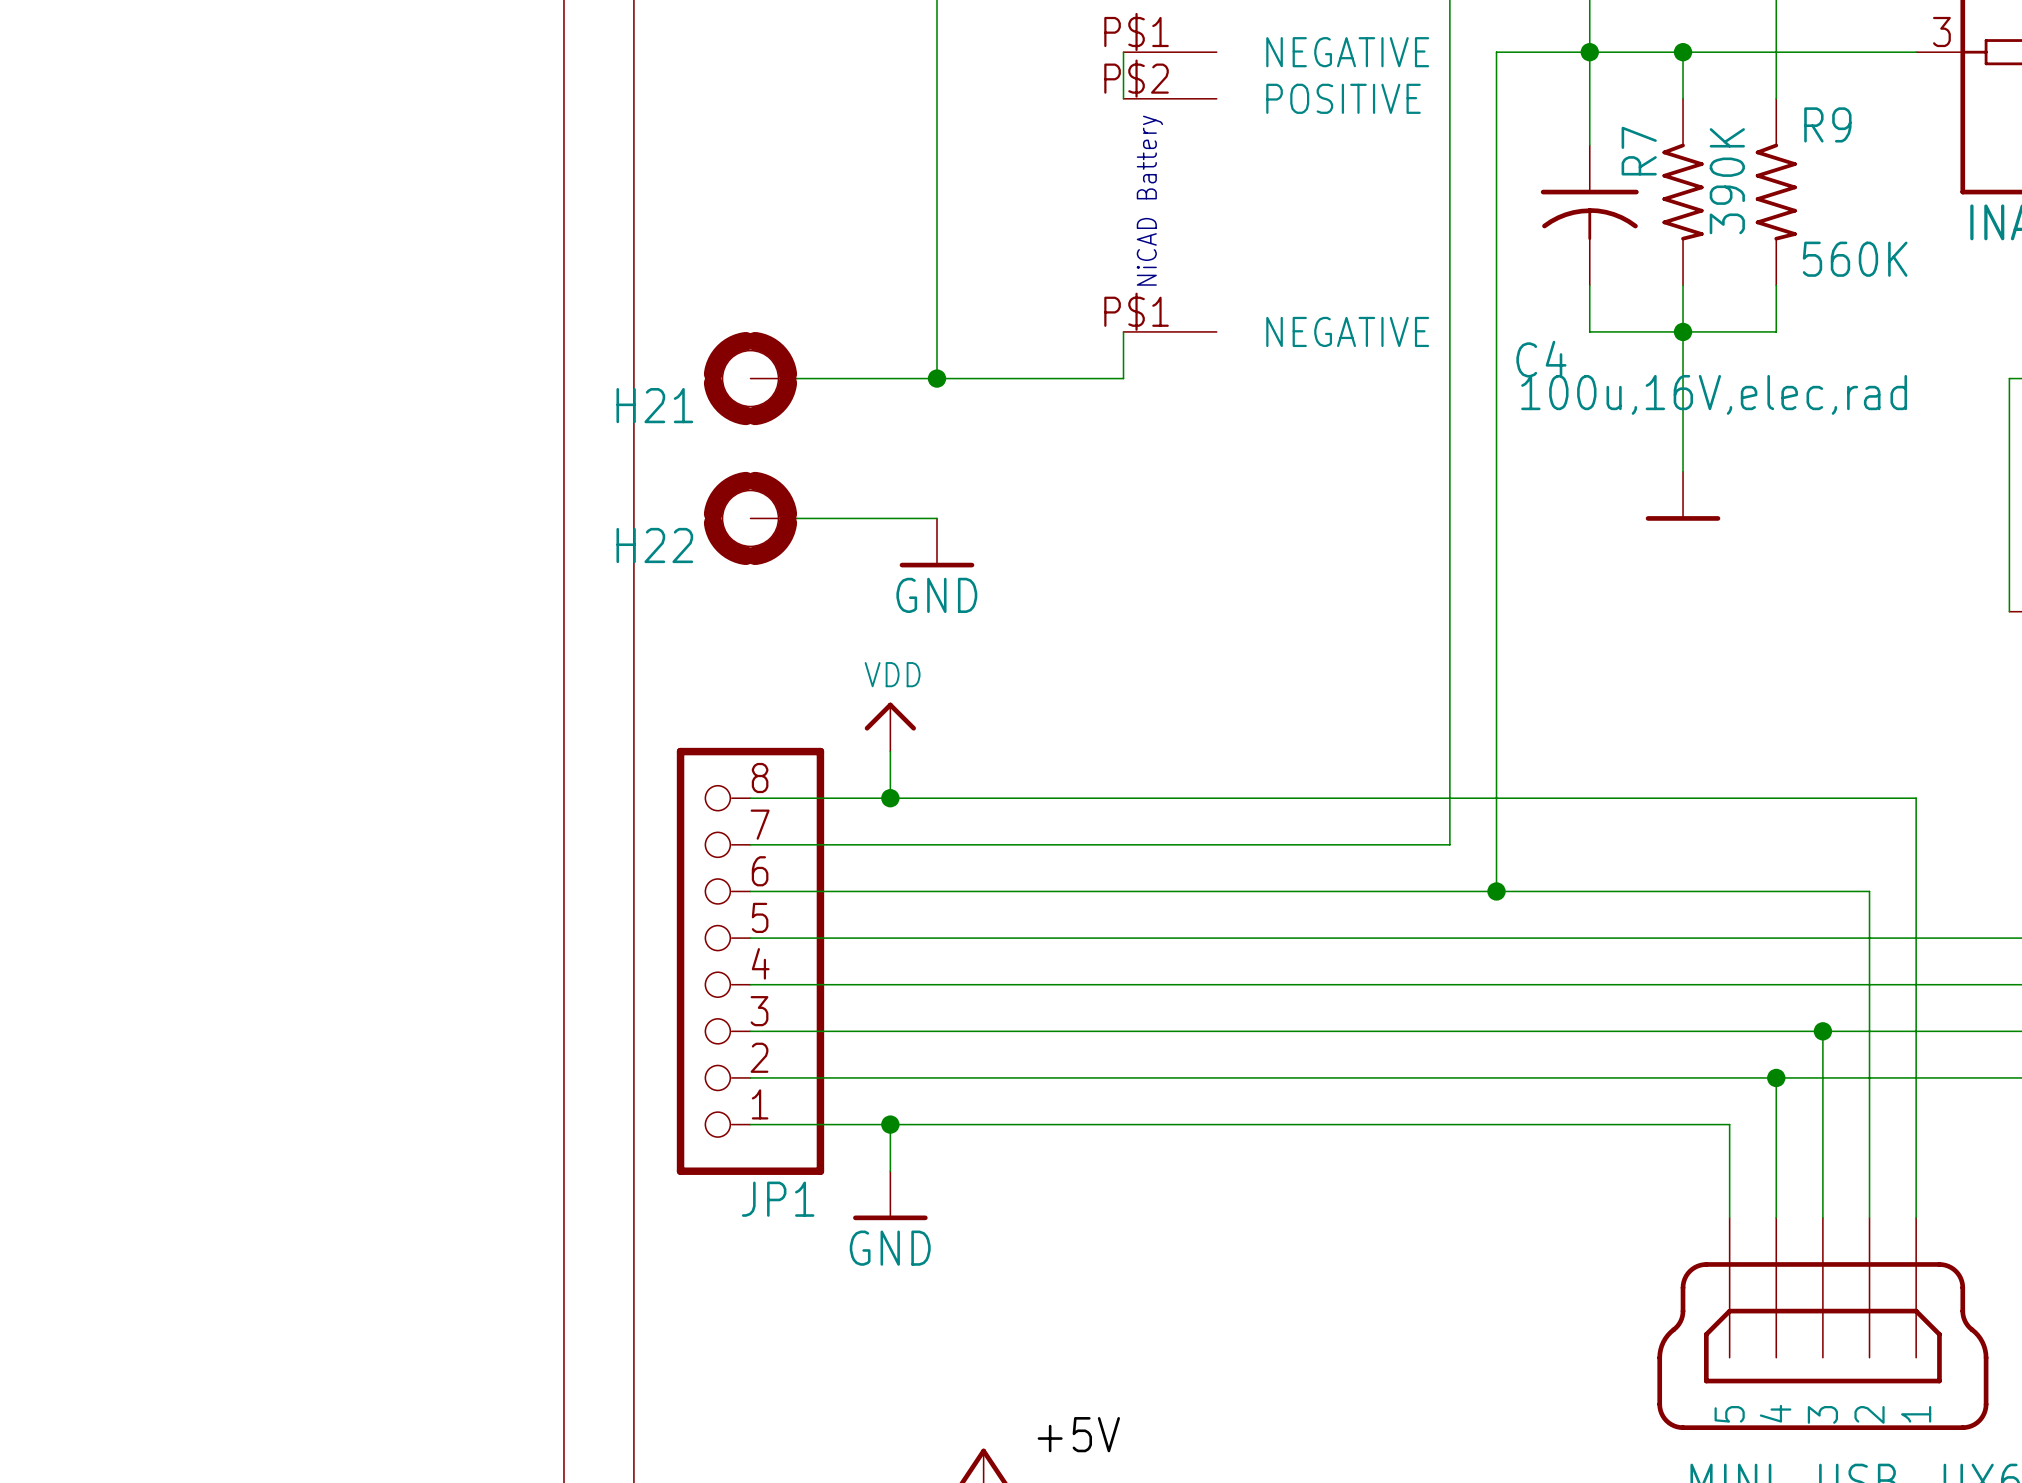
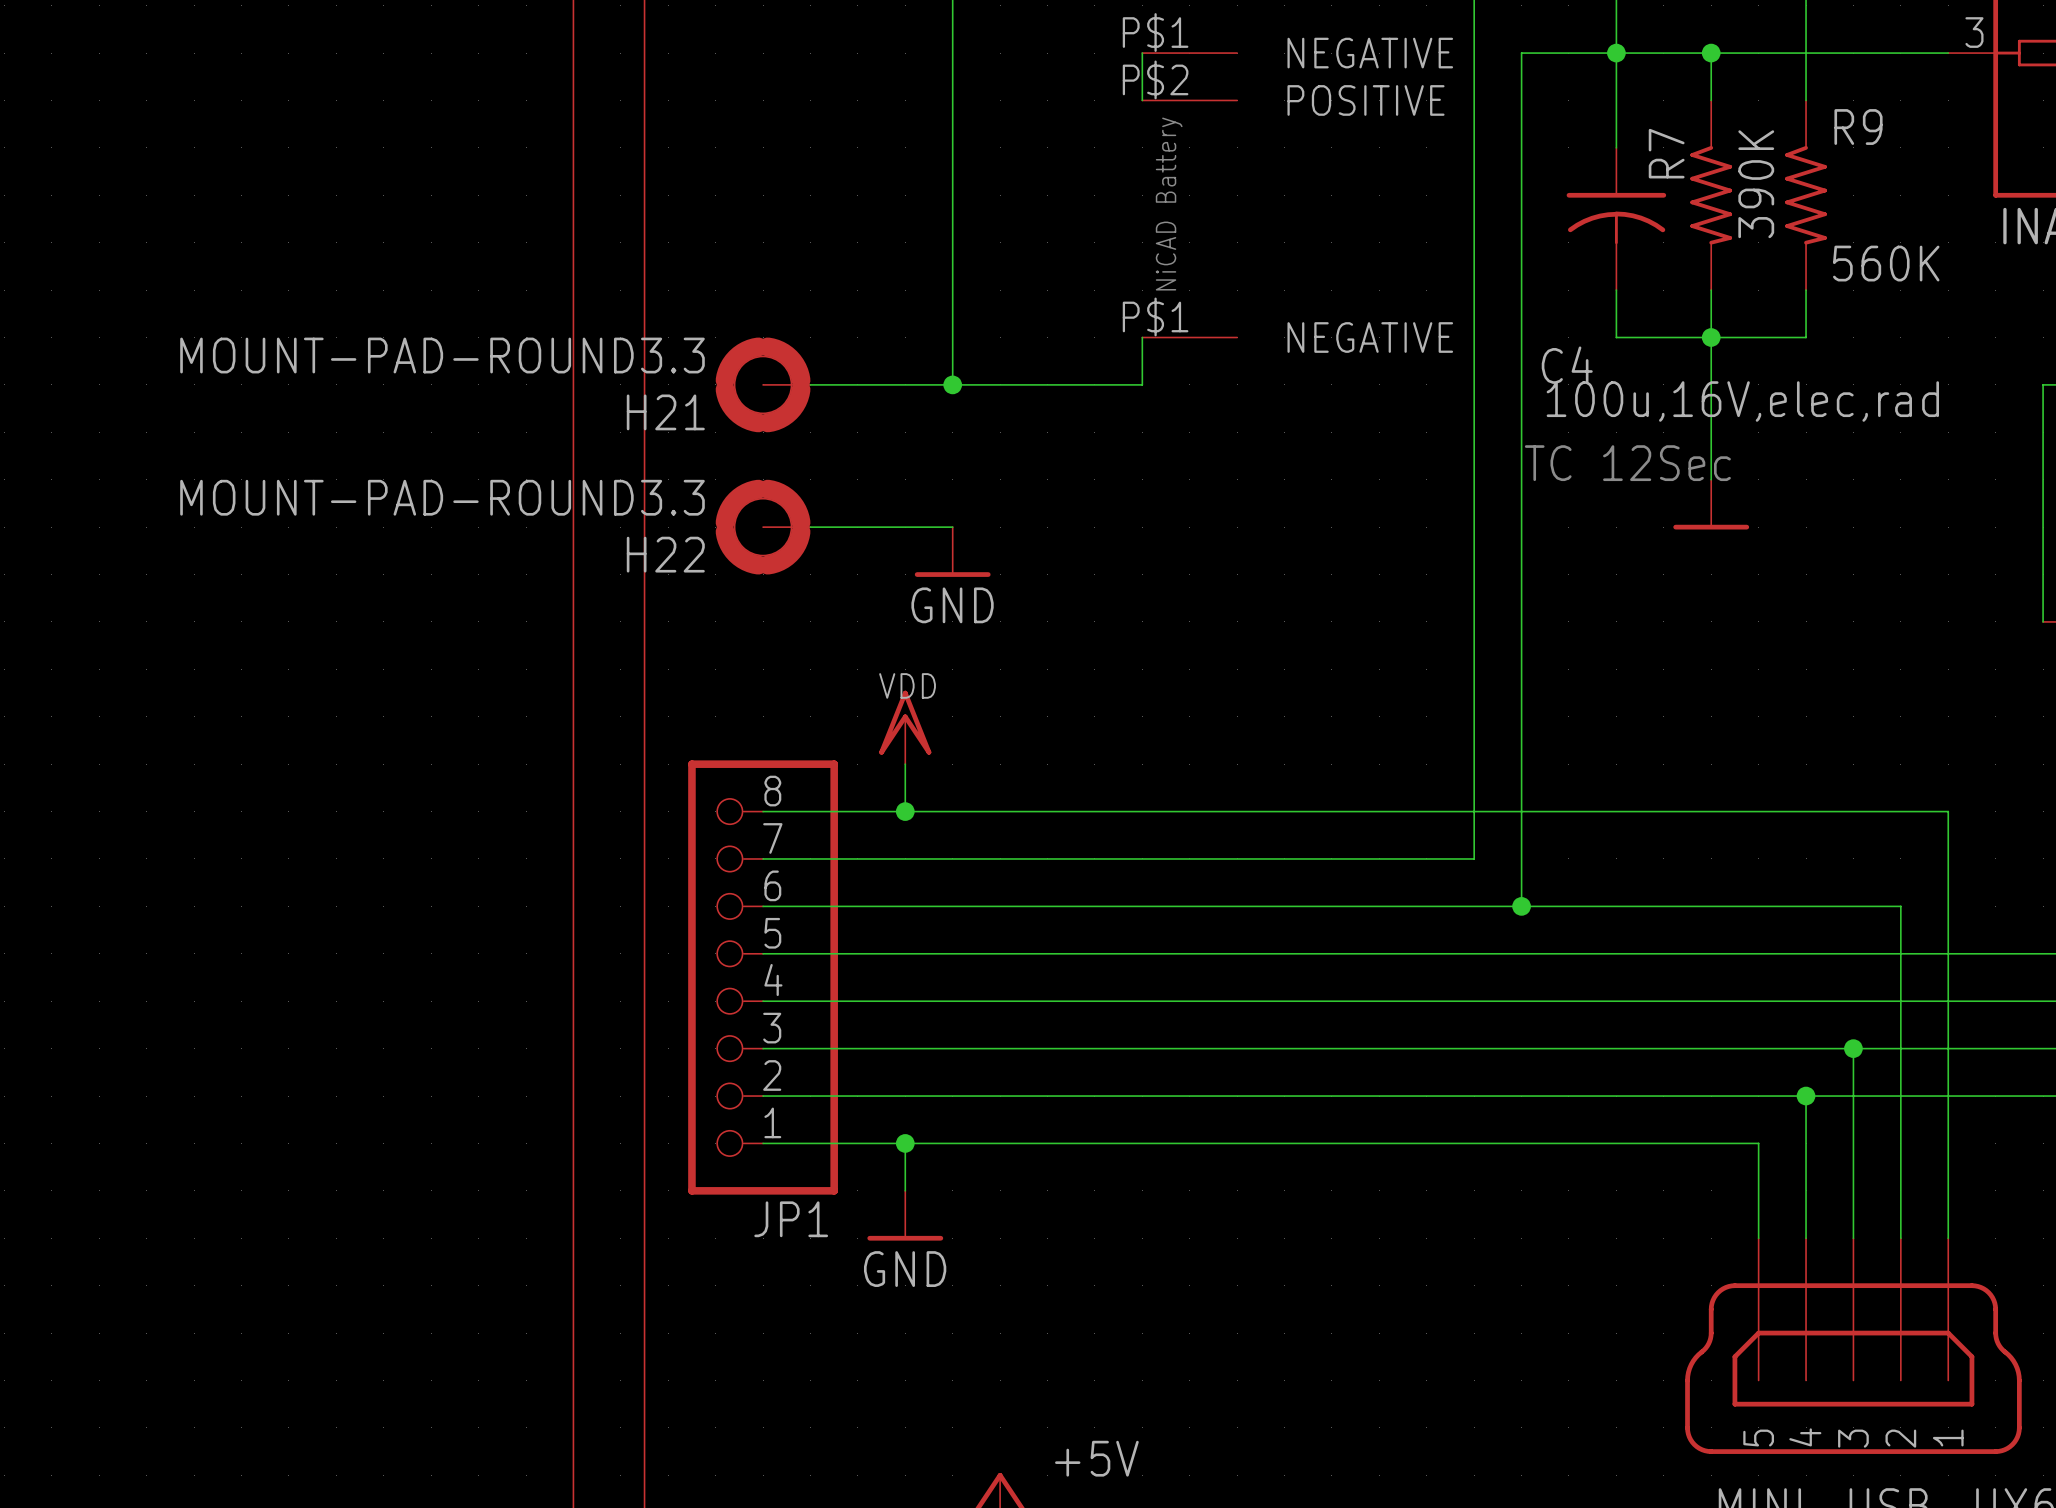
H21 value: none -> MOUNT-PAD-ROUND3.3 (442, 355)
text: none -> TC 12Sec (1627, 463)
H22 value: none -> MOUNT-PAD-ROUND3.3 (442, 497)
power symbol shape: [864, 702, 917, 752] -> [879, 690, 932, 765]

